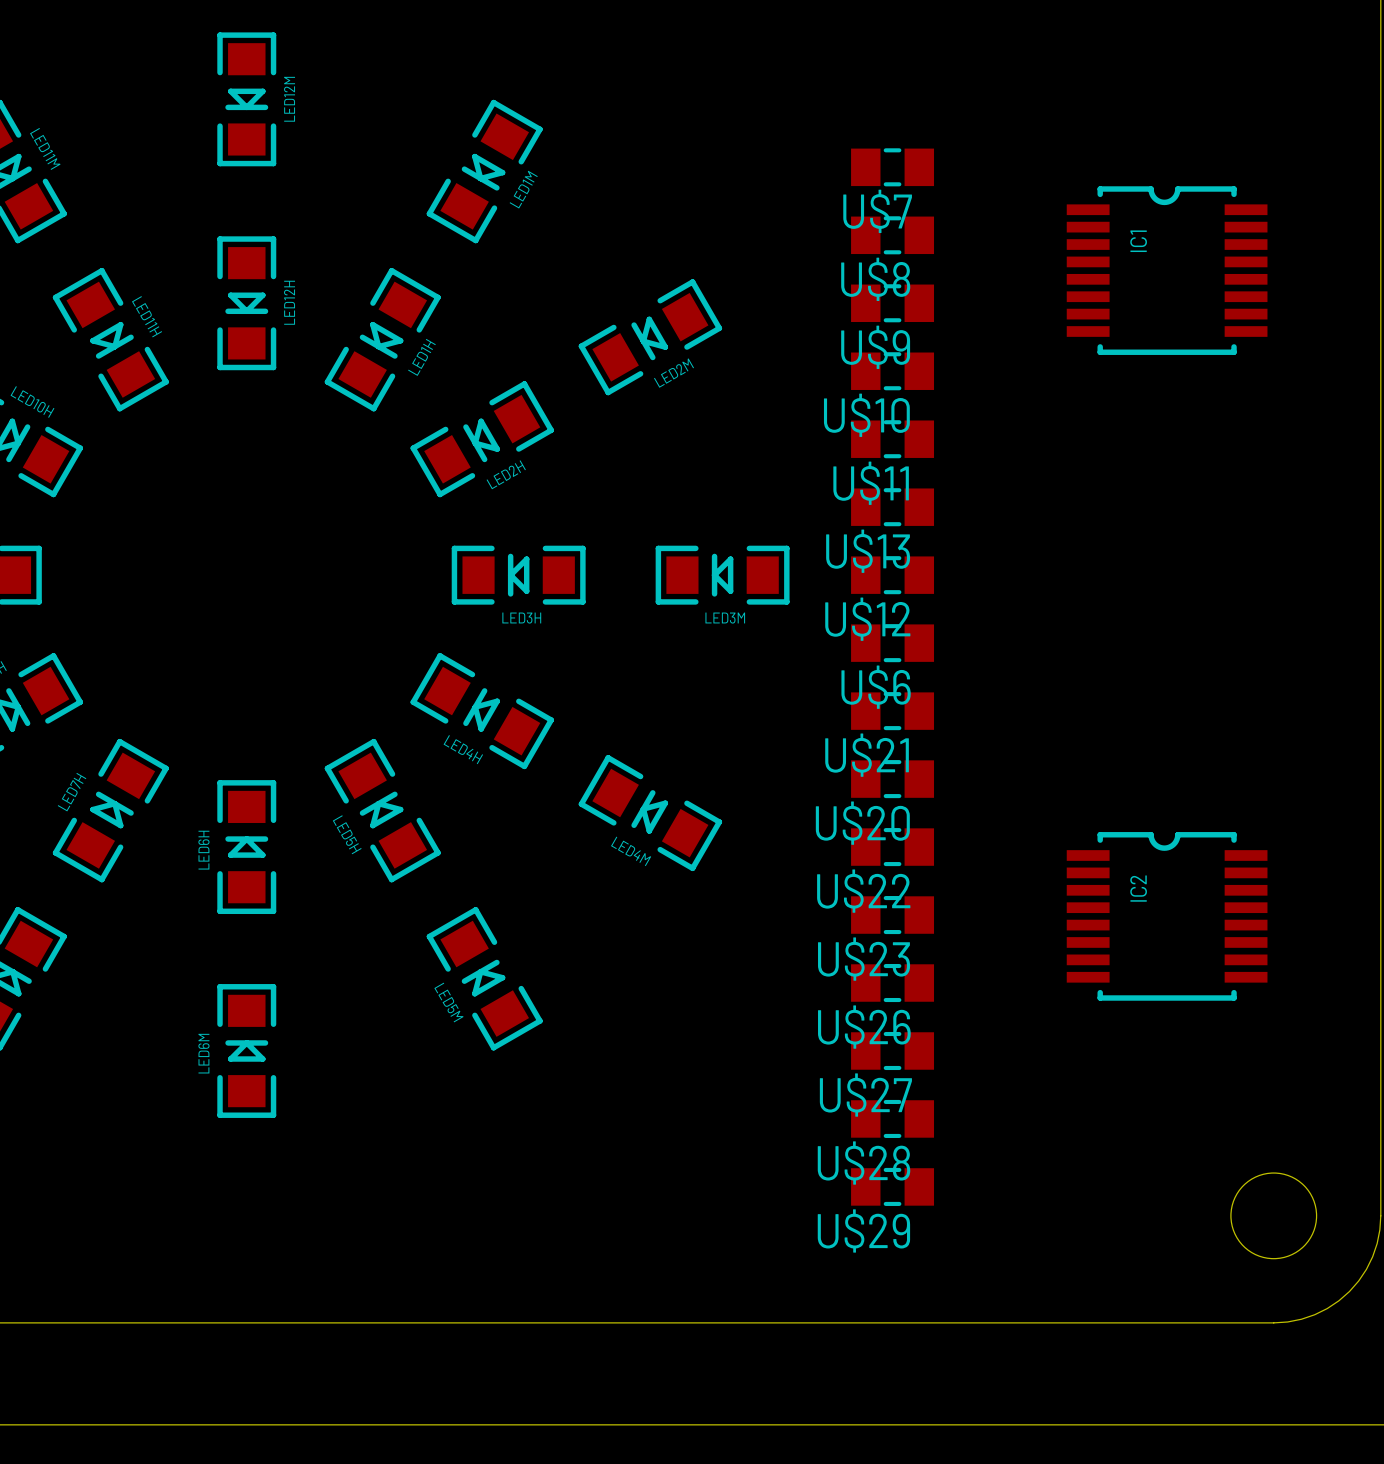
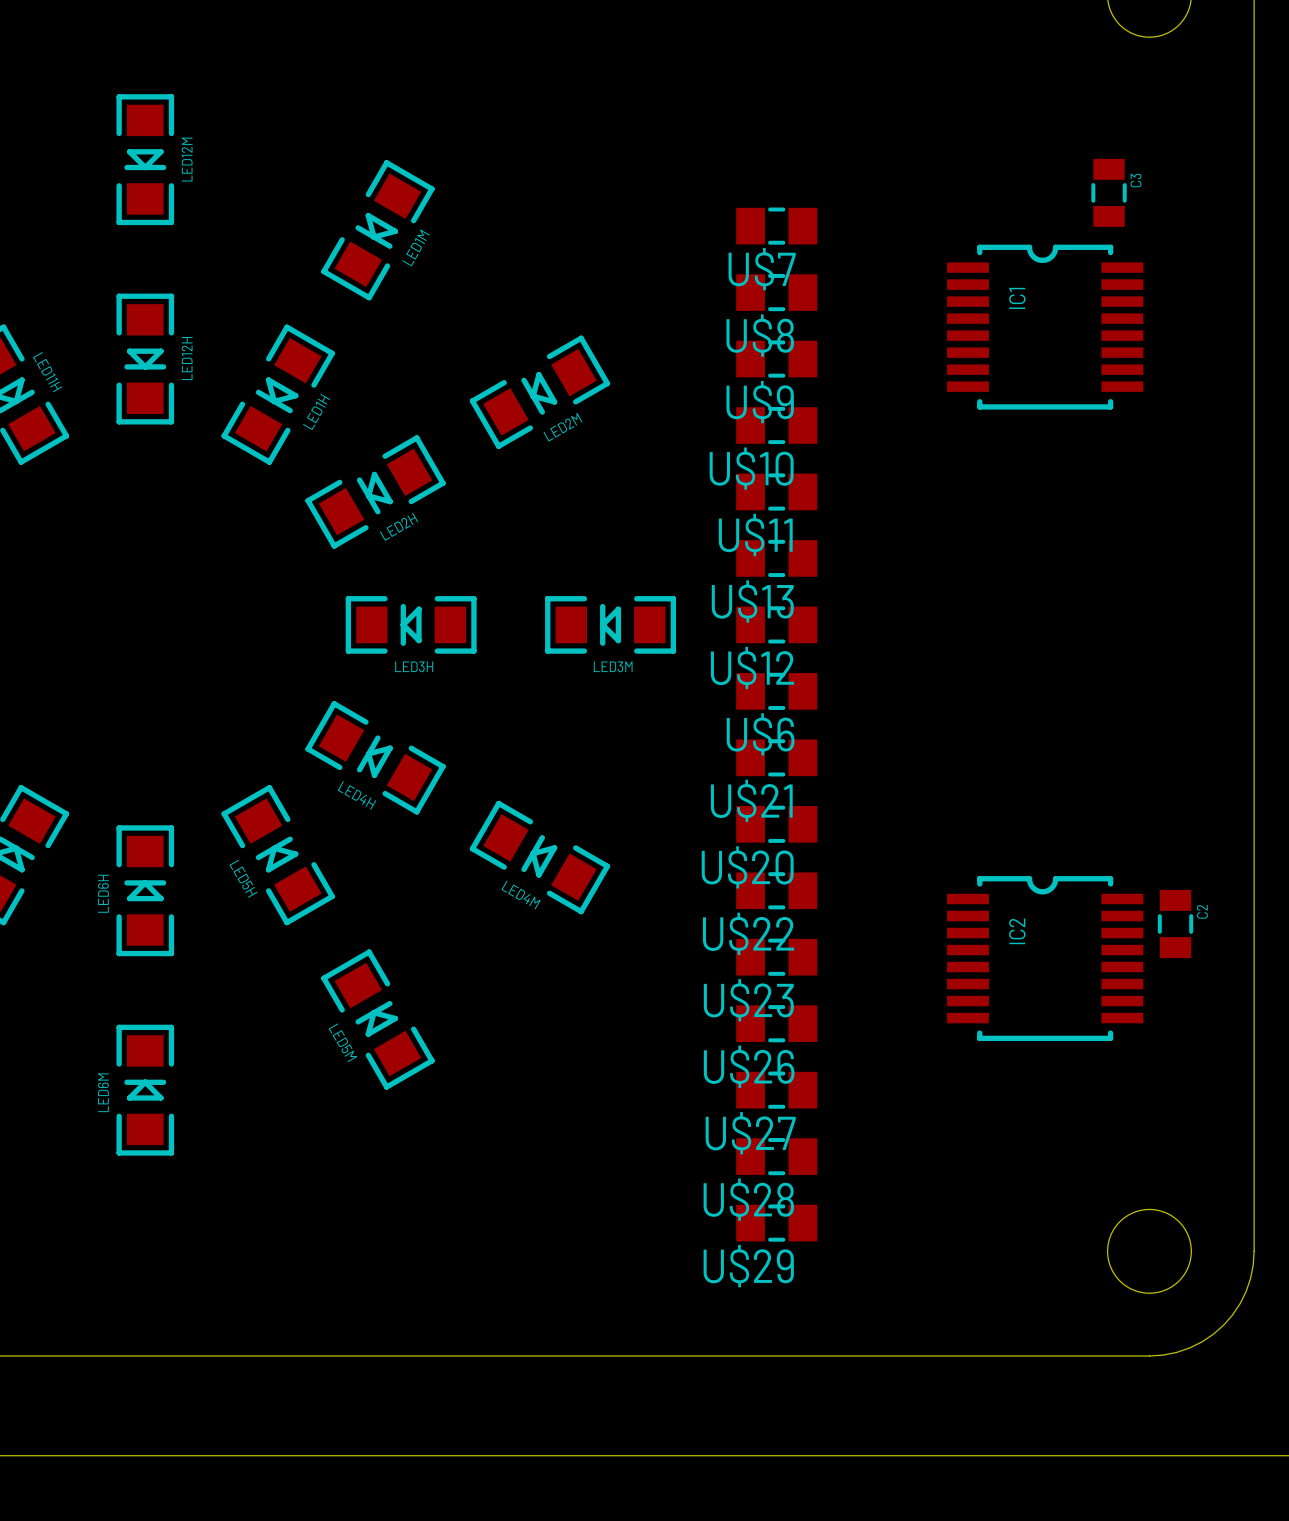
C3: none -> (1109, 192)
C2: none -> (1175, 923)

